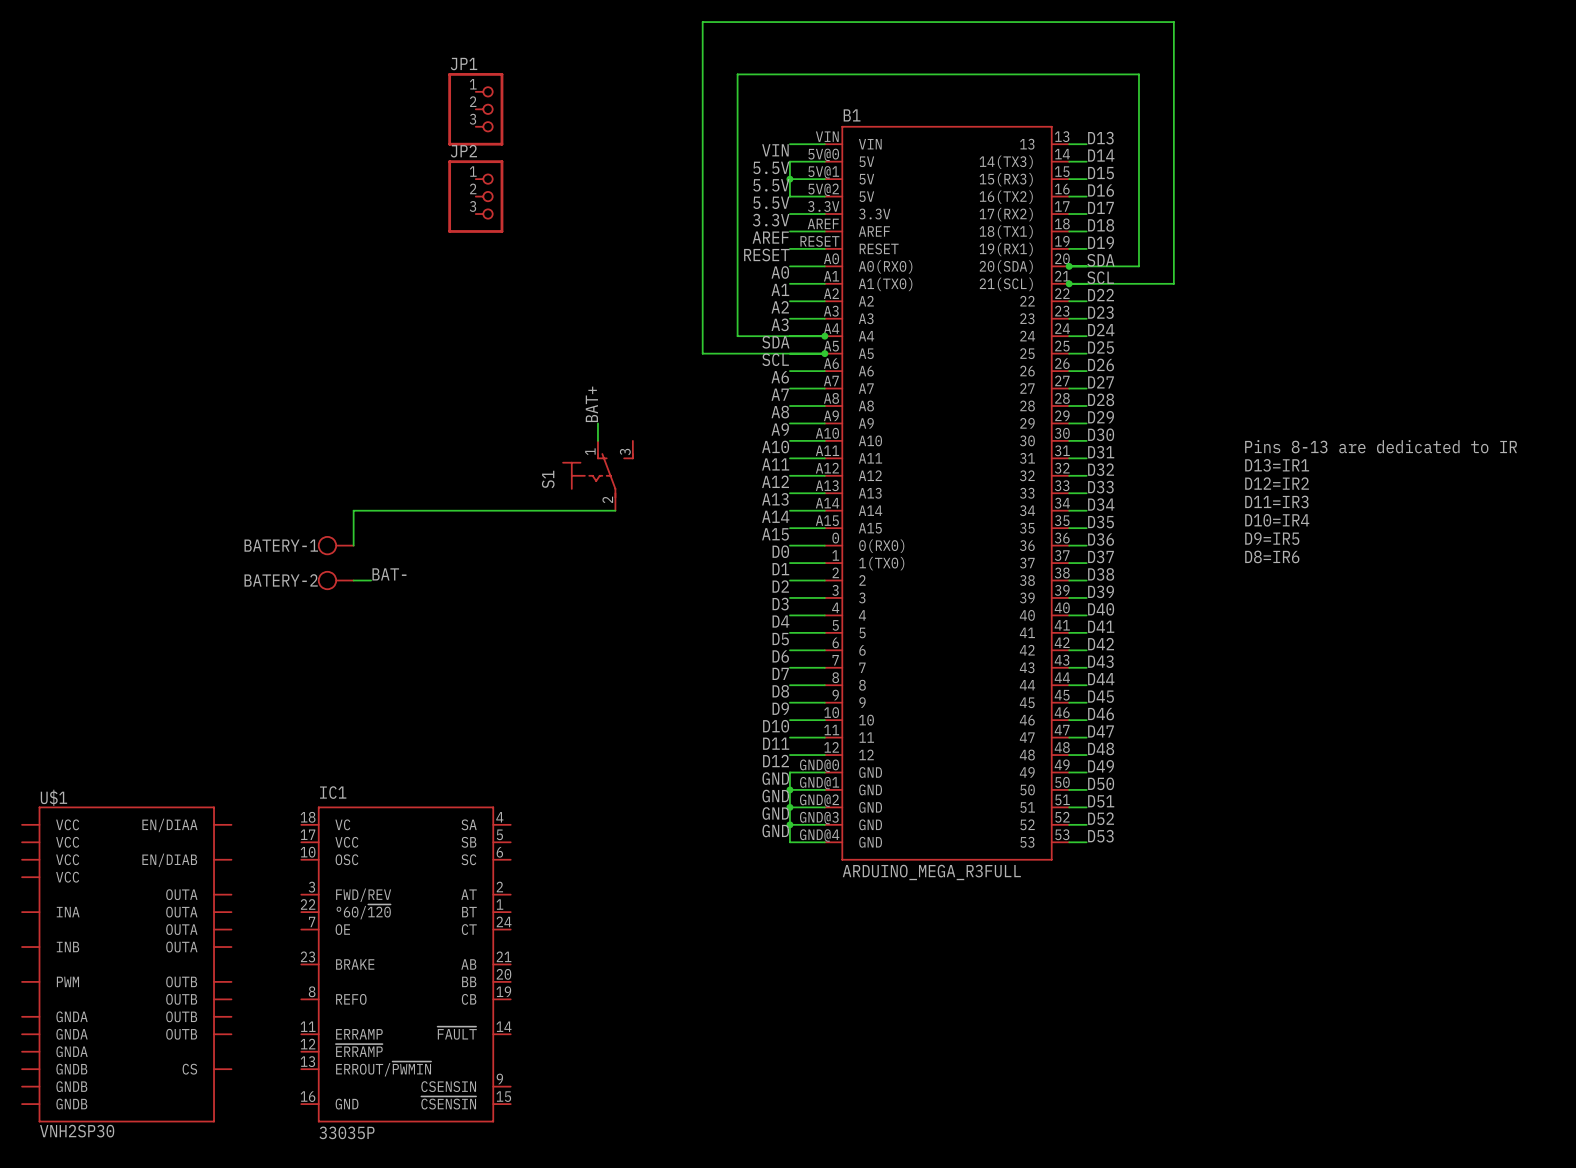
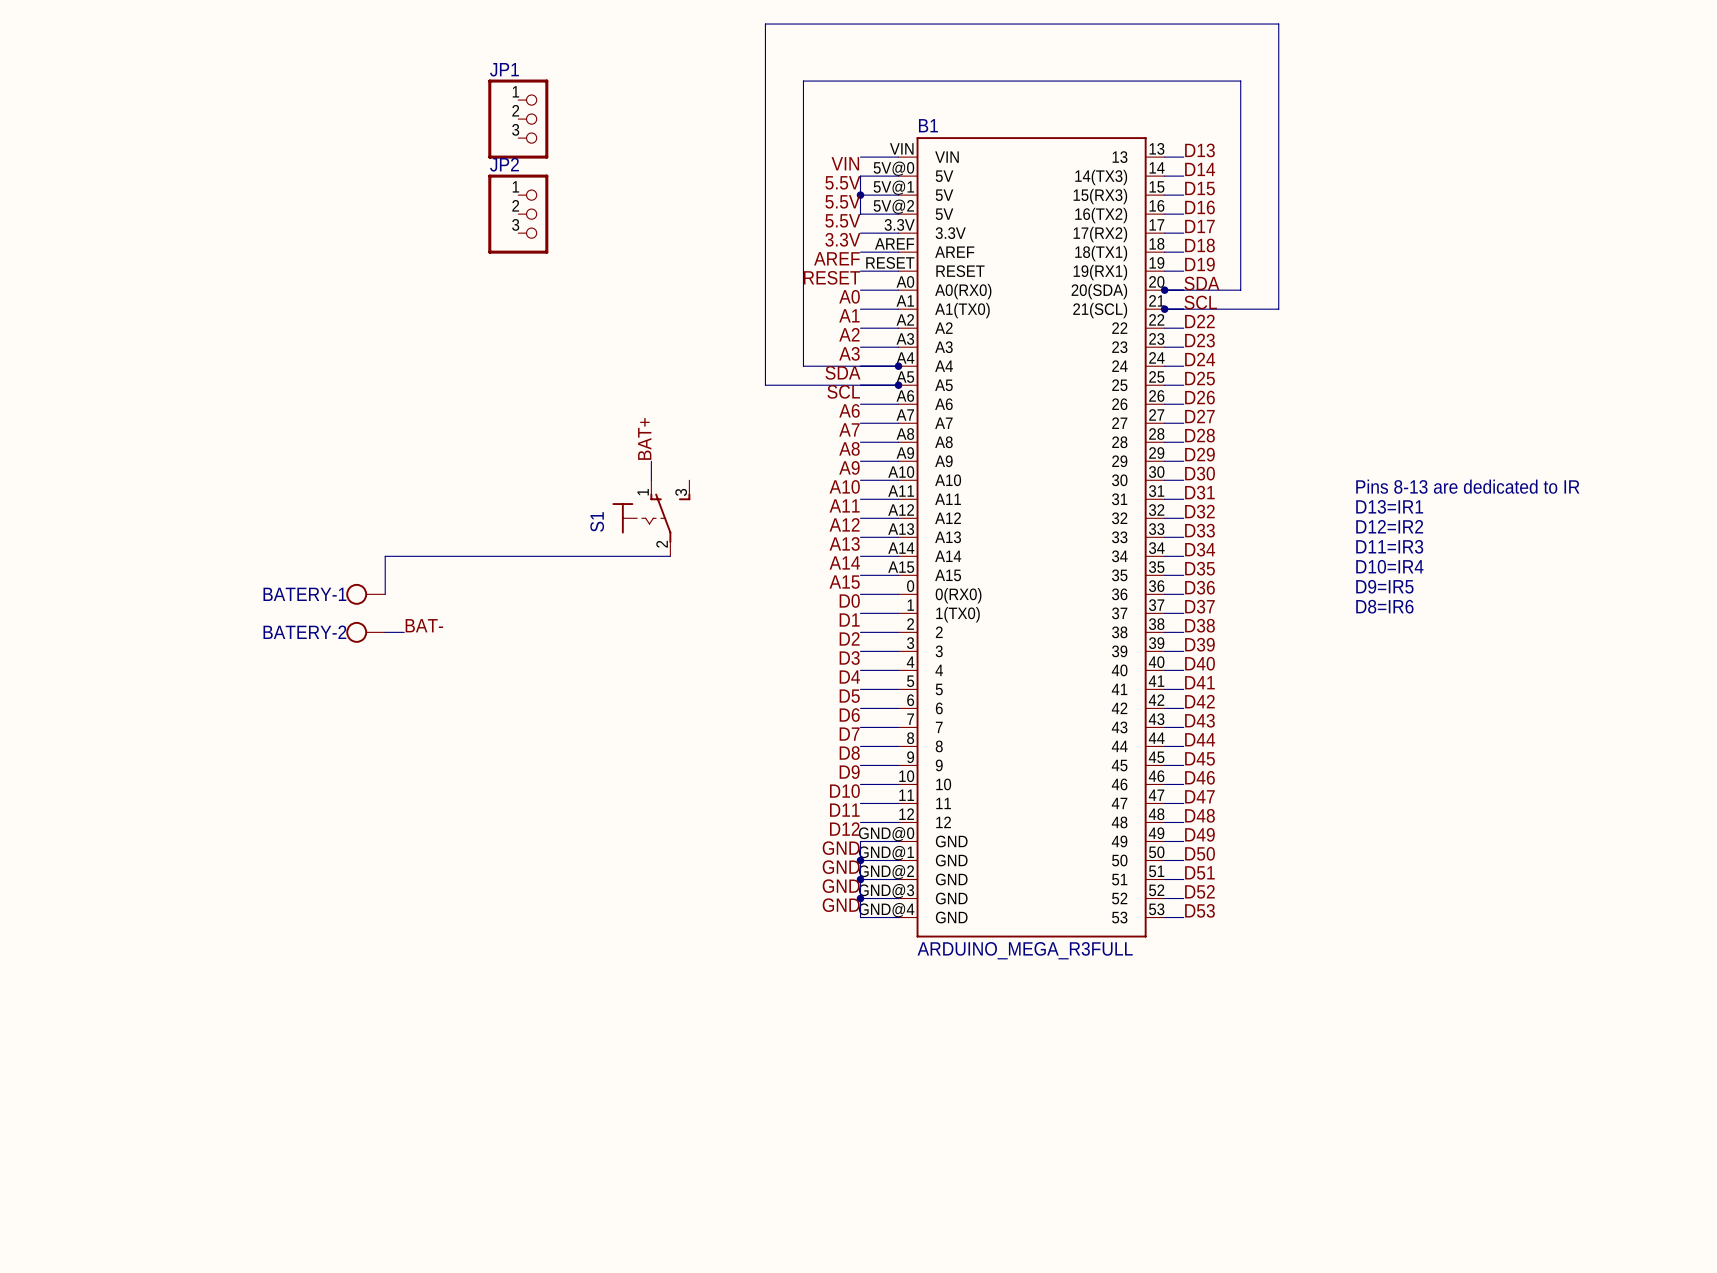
U$1: VNH2SP30 (126, 964) -> none
IC1: 33035P (405, 964) -> none

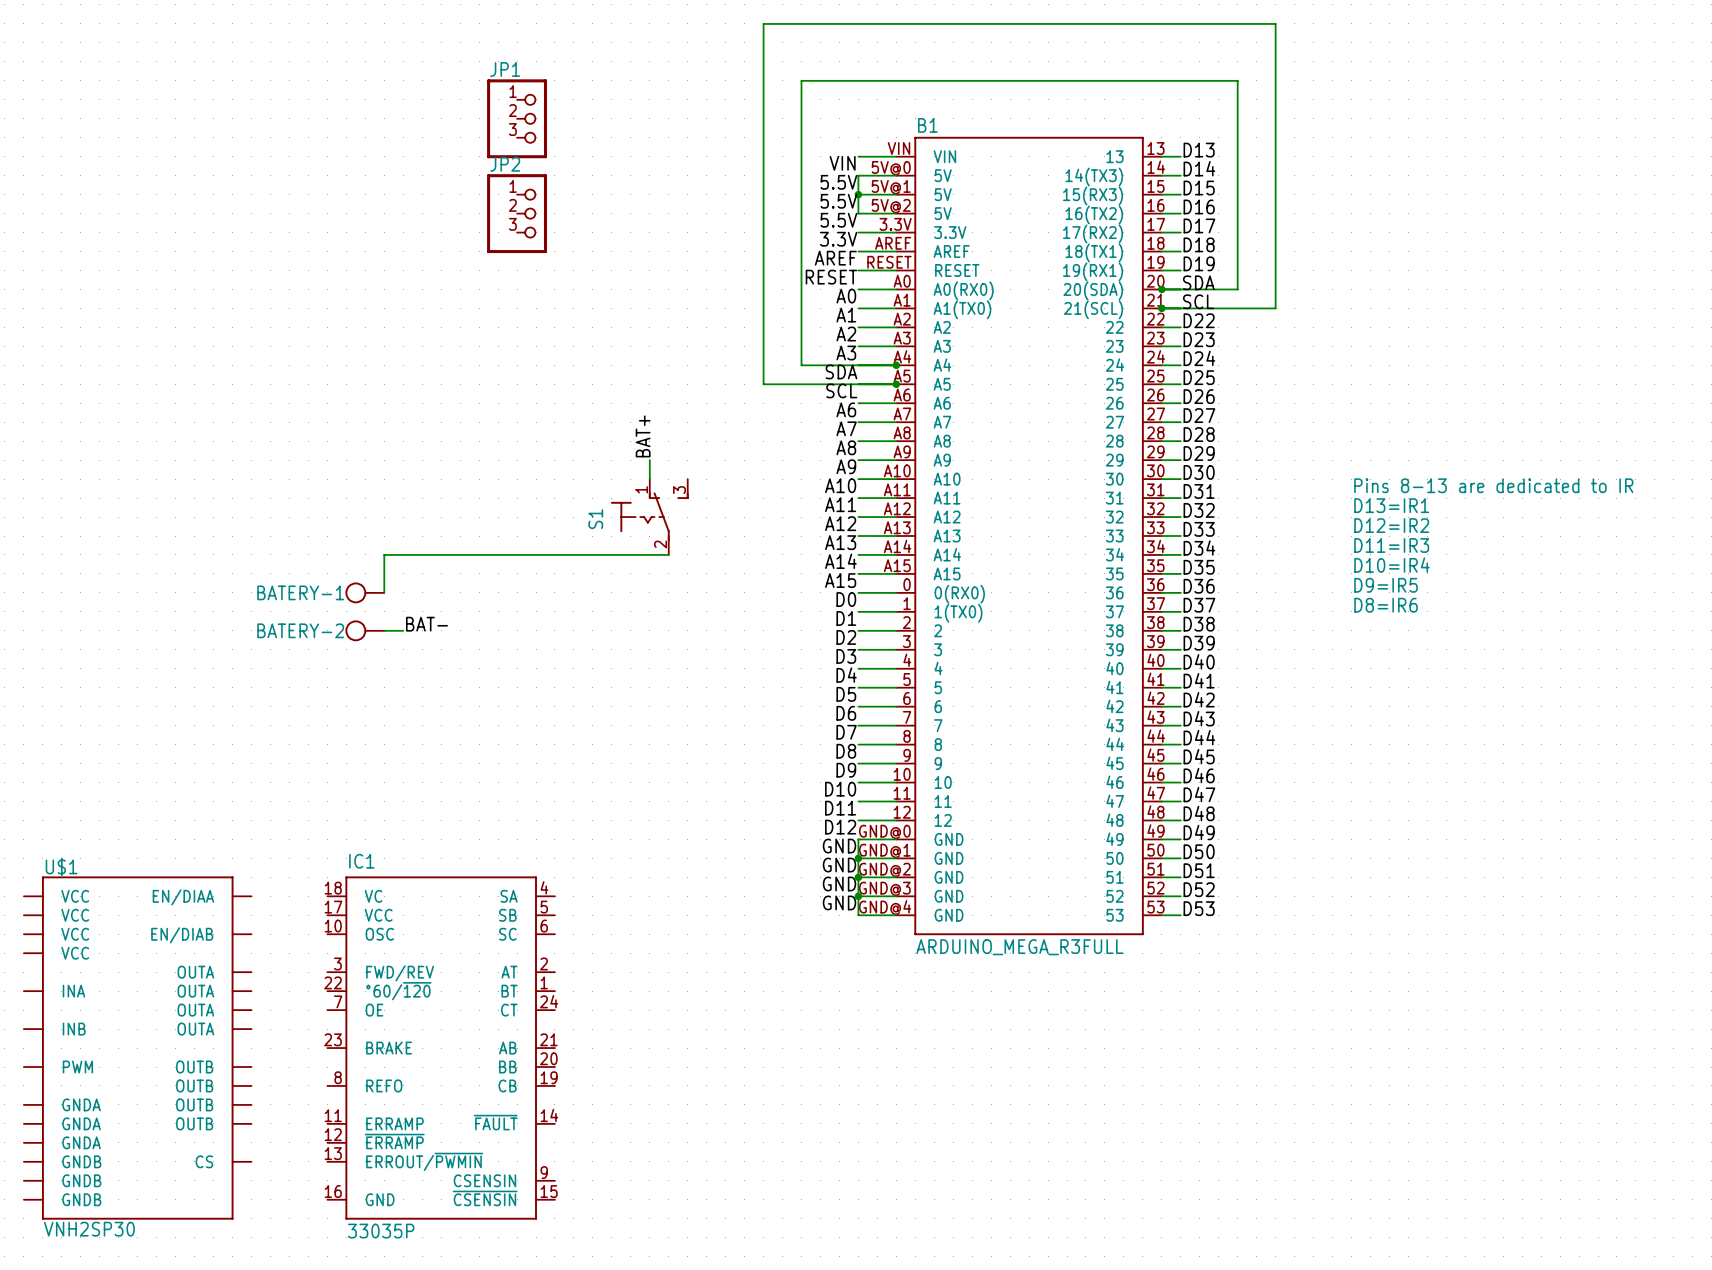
U$1: none -> VNH2SP30 (137, 1048)
IC1: none -> 33035P (441, 1048)

